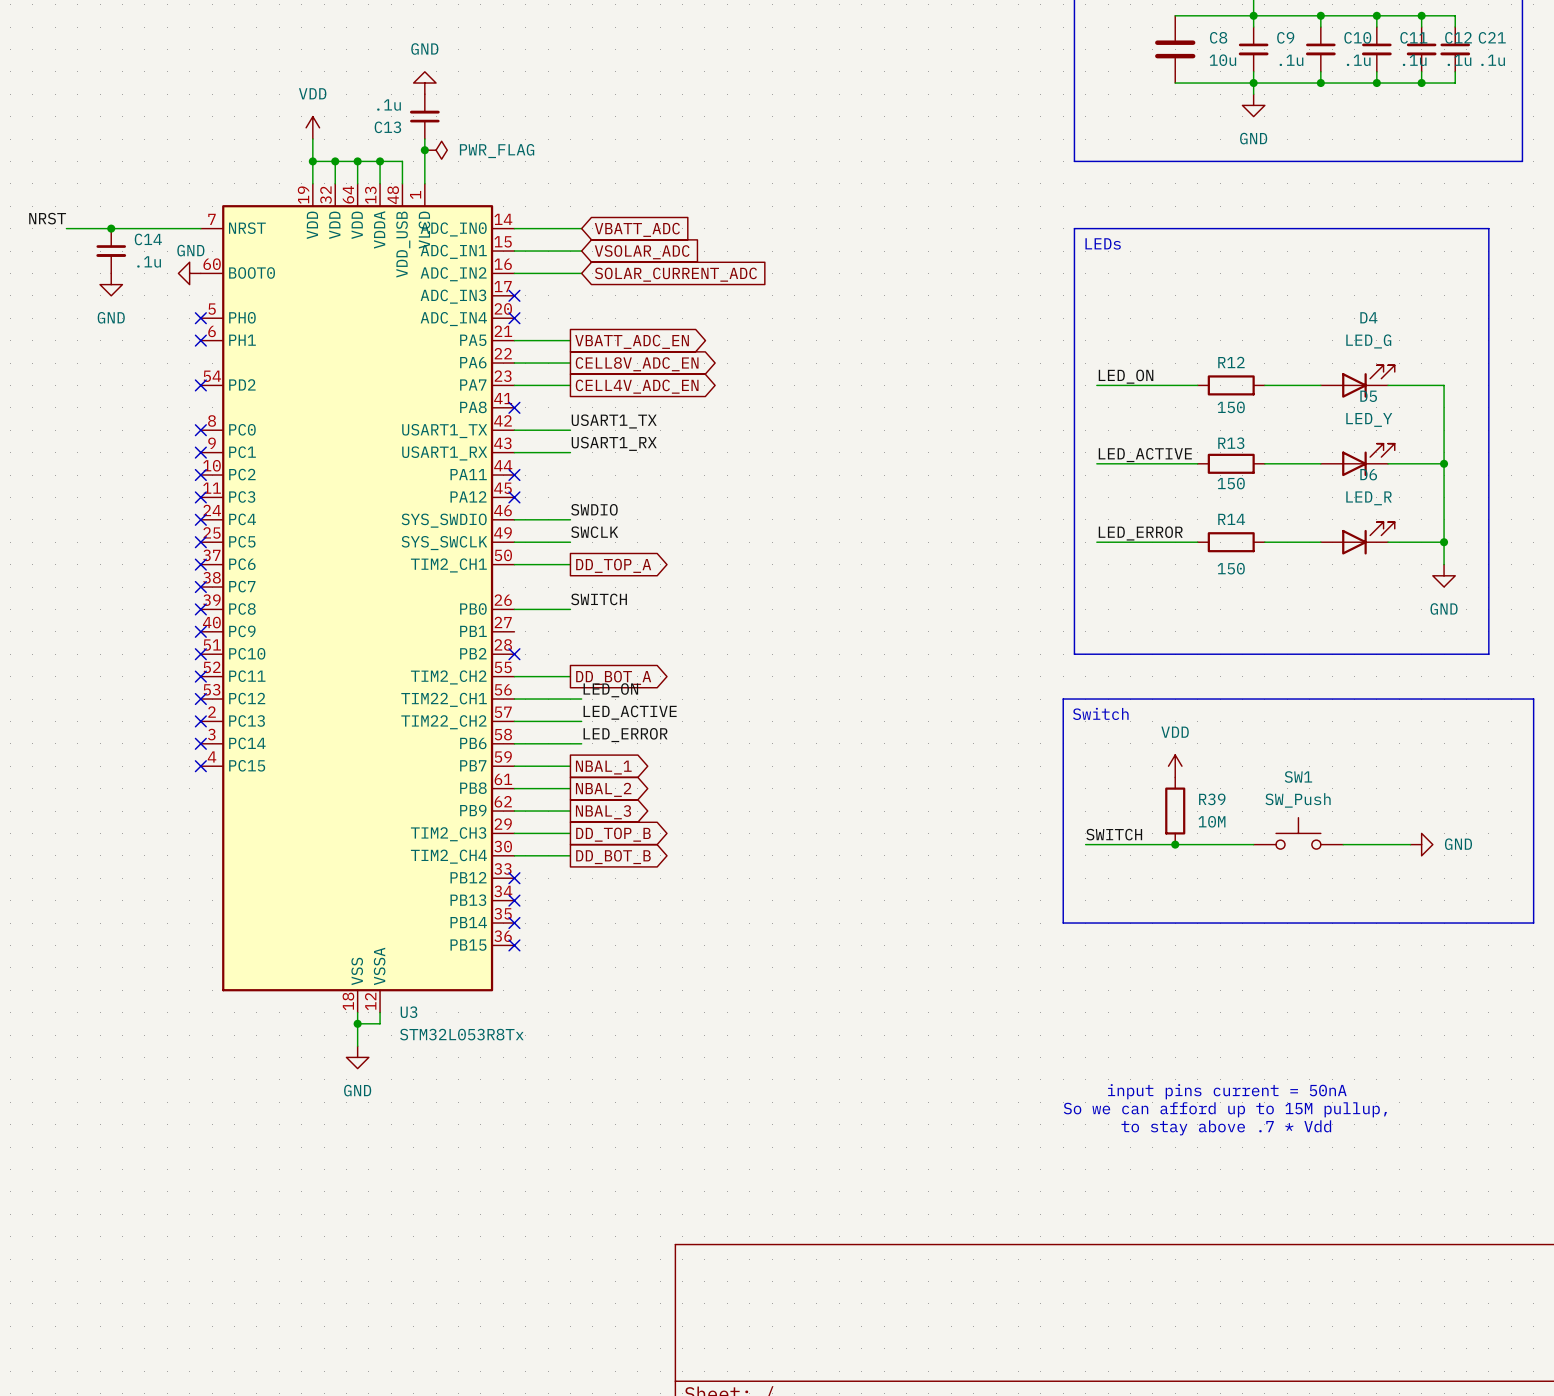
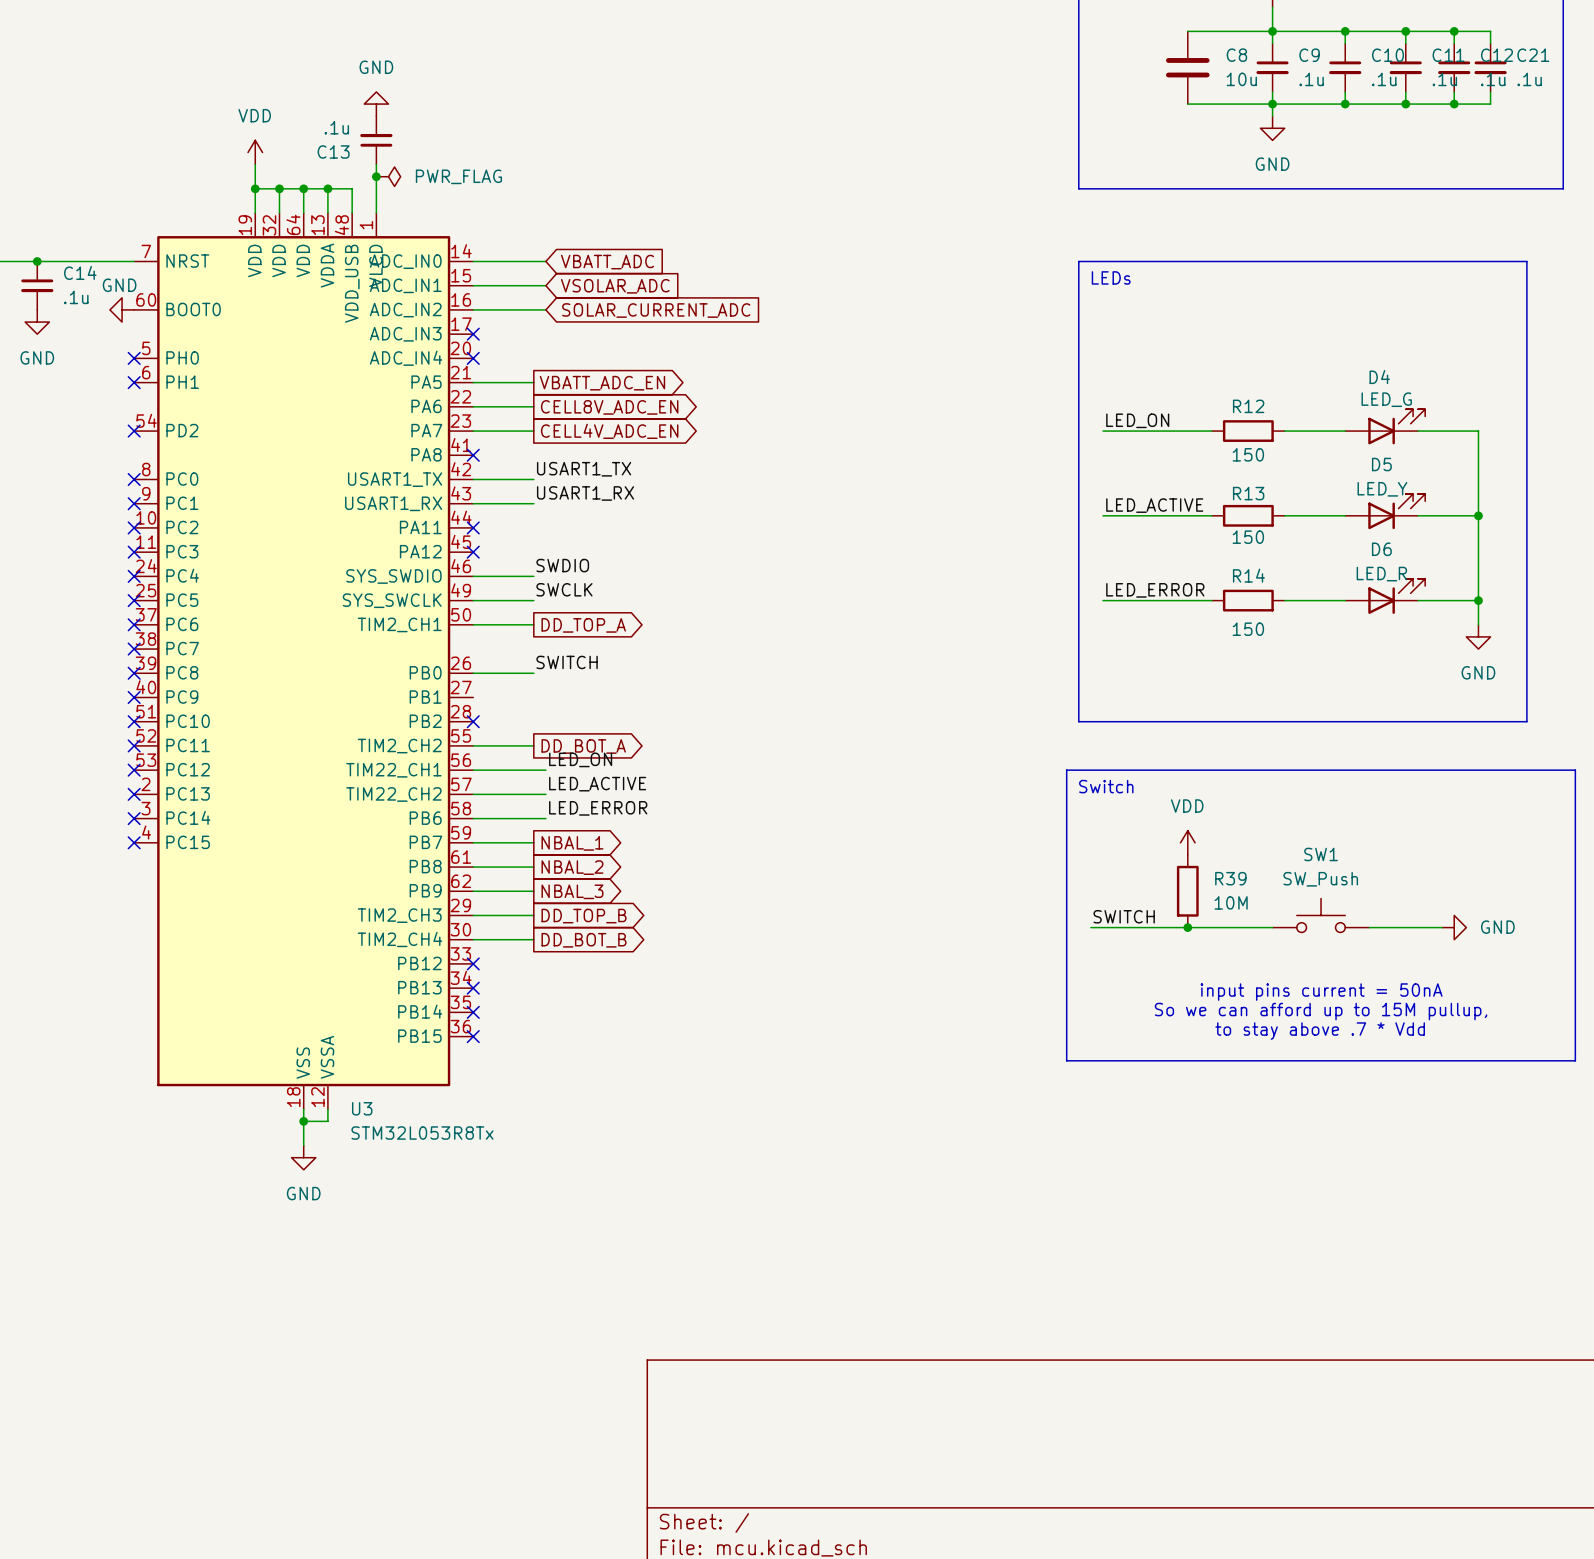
D4 name position: D4 (1368, 317) -> D4 (1379, 377)
D4 value position: LED_G (1368, 341) -> LED_G (1386, 399)
D5 name position: D5 (1368, 396) -> D5 (1381, 464)
D5 value position: LED_Y (1369, 419) -> LED_Y (1382, 489)
D6 name position: D6 (1368, 474) -> D6 (1381, 549)
D6 value position: LED_R (1368, 498) -> LED_R (1381, 574)
line: (1063, 923) (1533, 923) -> (1066, 1012) (1066, 1060) (1575, 1060) (1575, 1012)
text position: input pins current = 50nA (1227, 1091) -> input pins current = 50nA (1321, 992)
text position: So we can afford up to 15M pullup, (1225, 1109) -> So we can afford up to 15M pullup, (1321, 1011)
text position: to stay above .7 * Vdd (1226, 1127) -> to stay above .7 * Vdd (1320, 1031)

